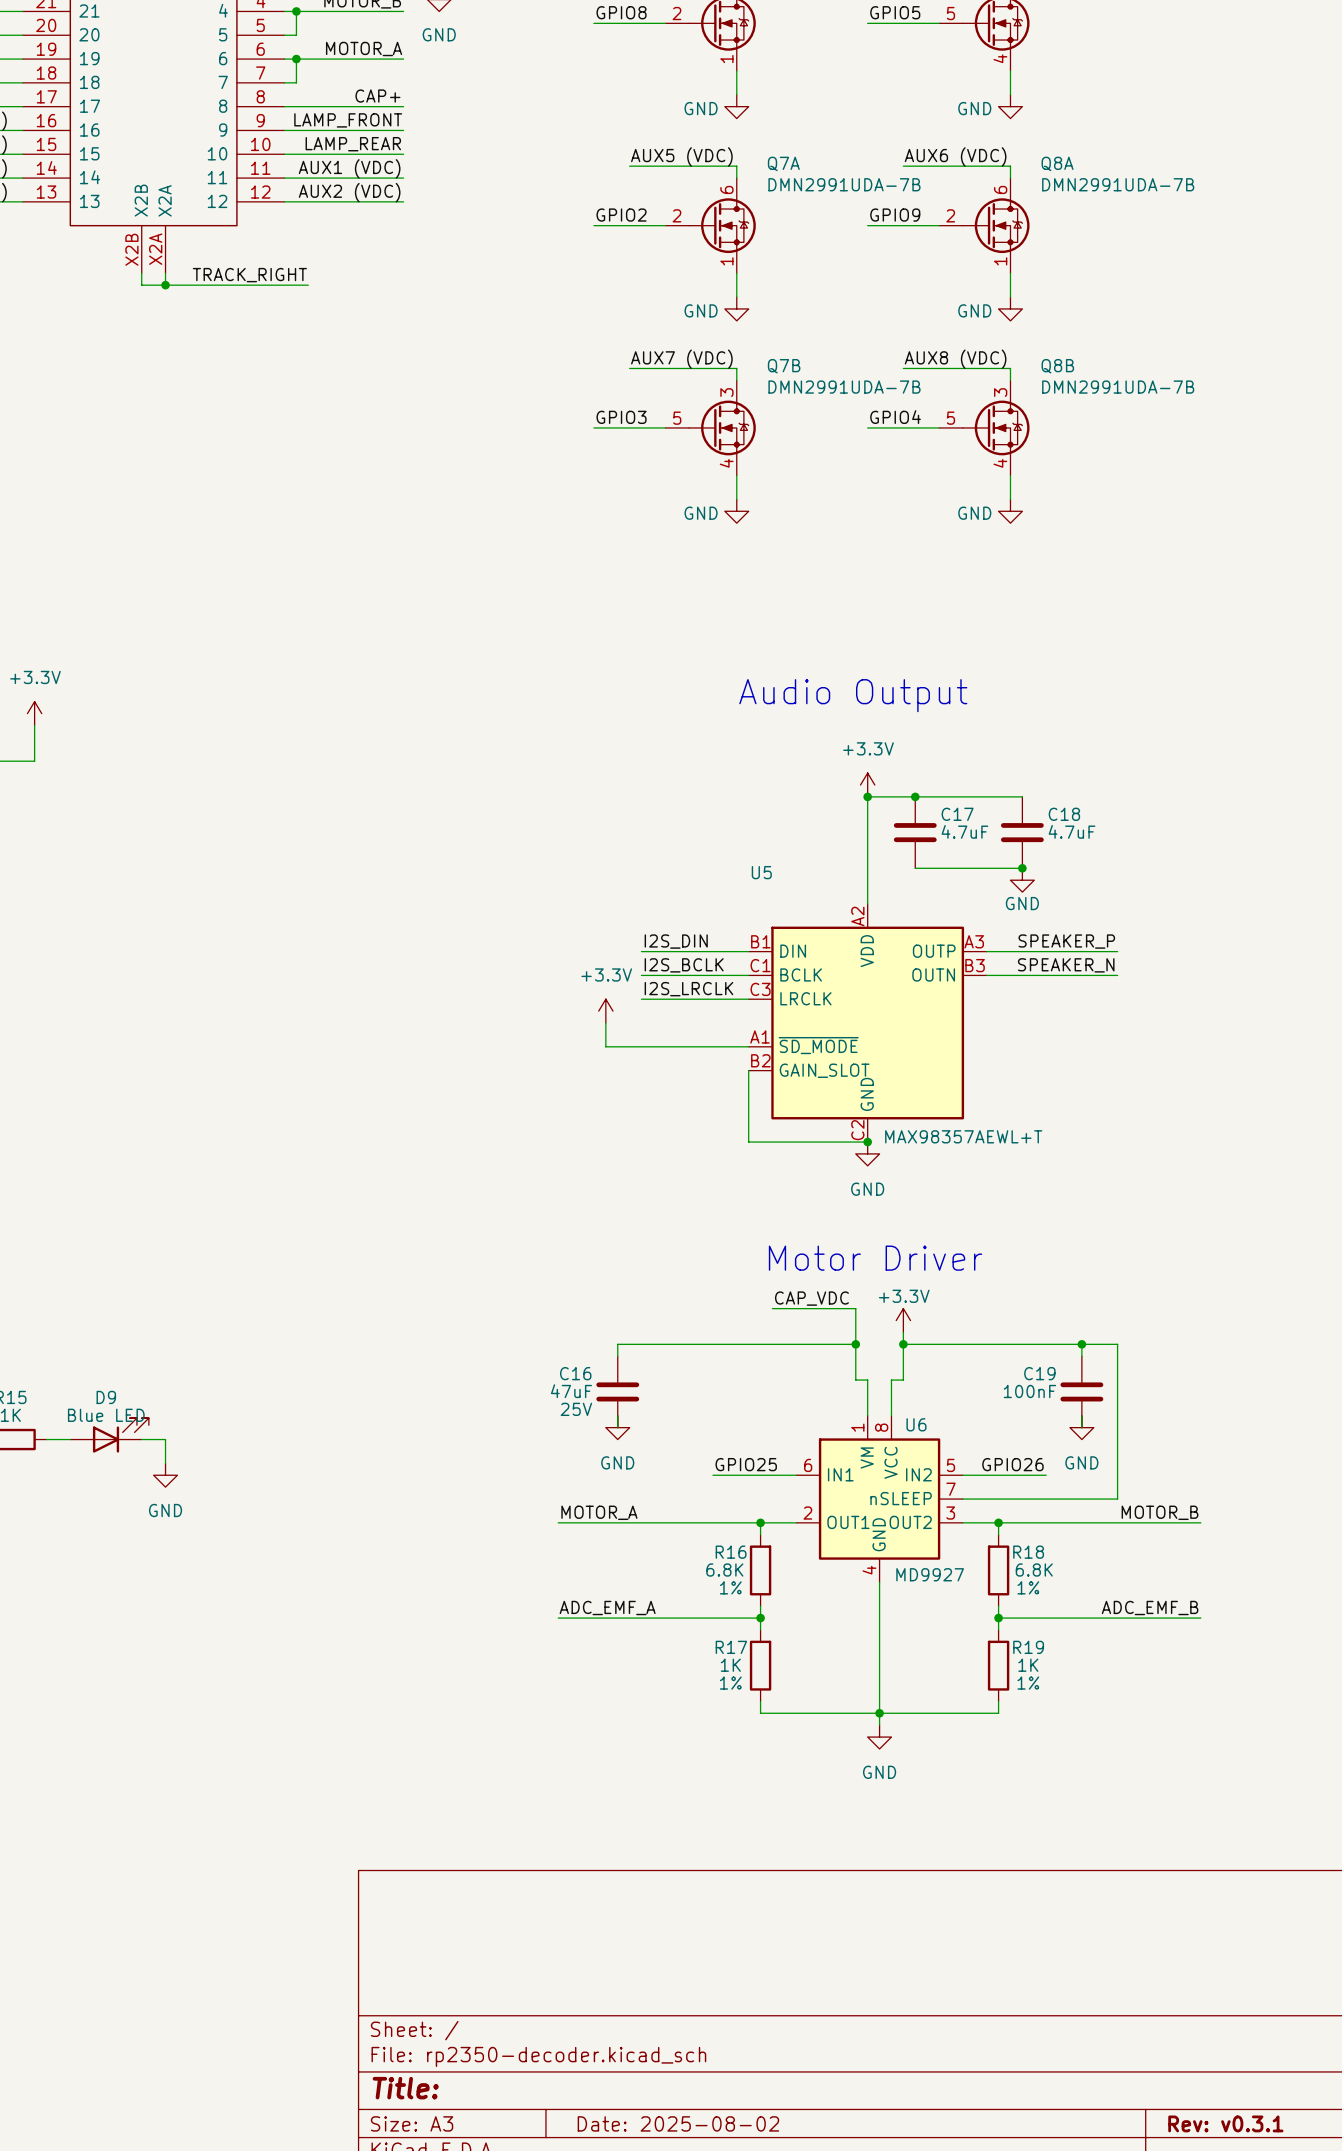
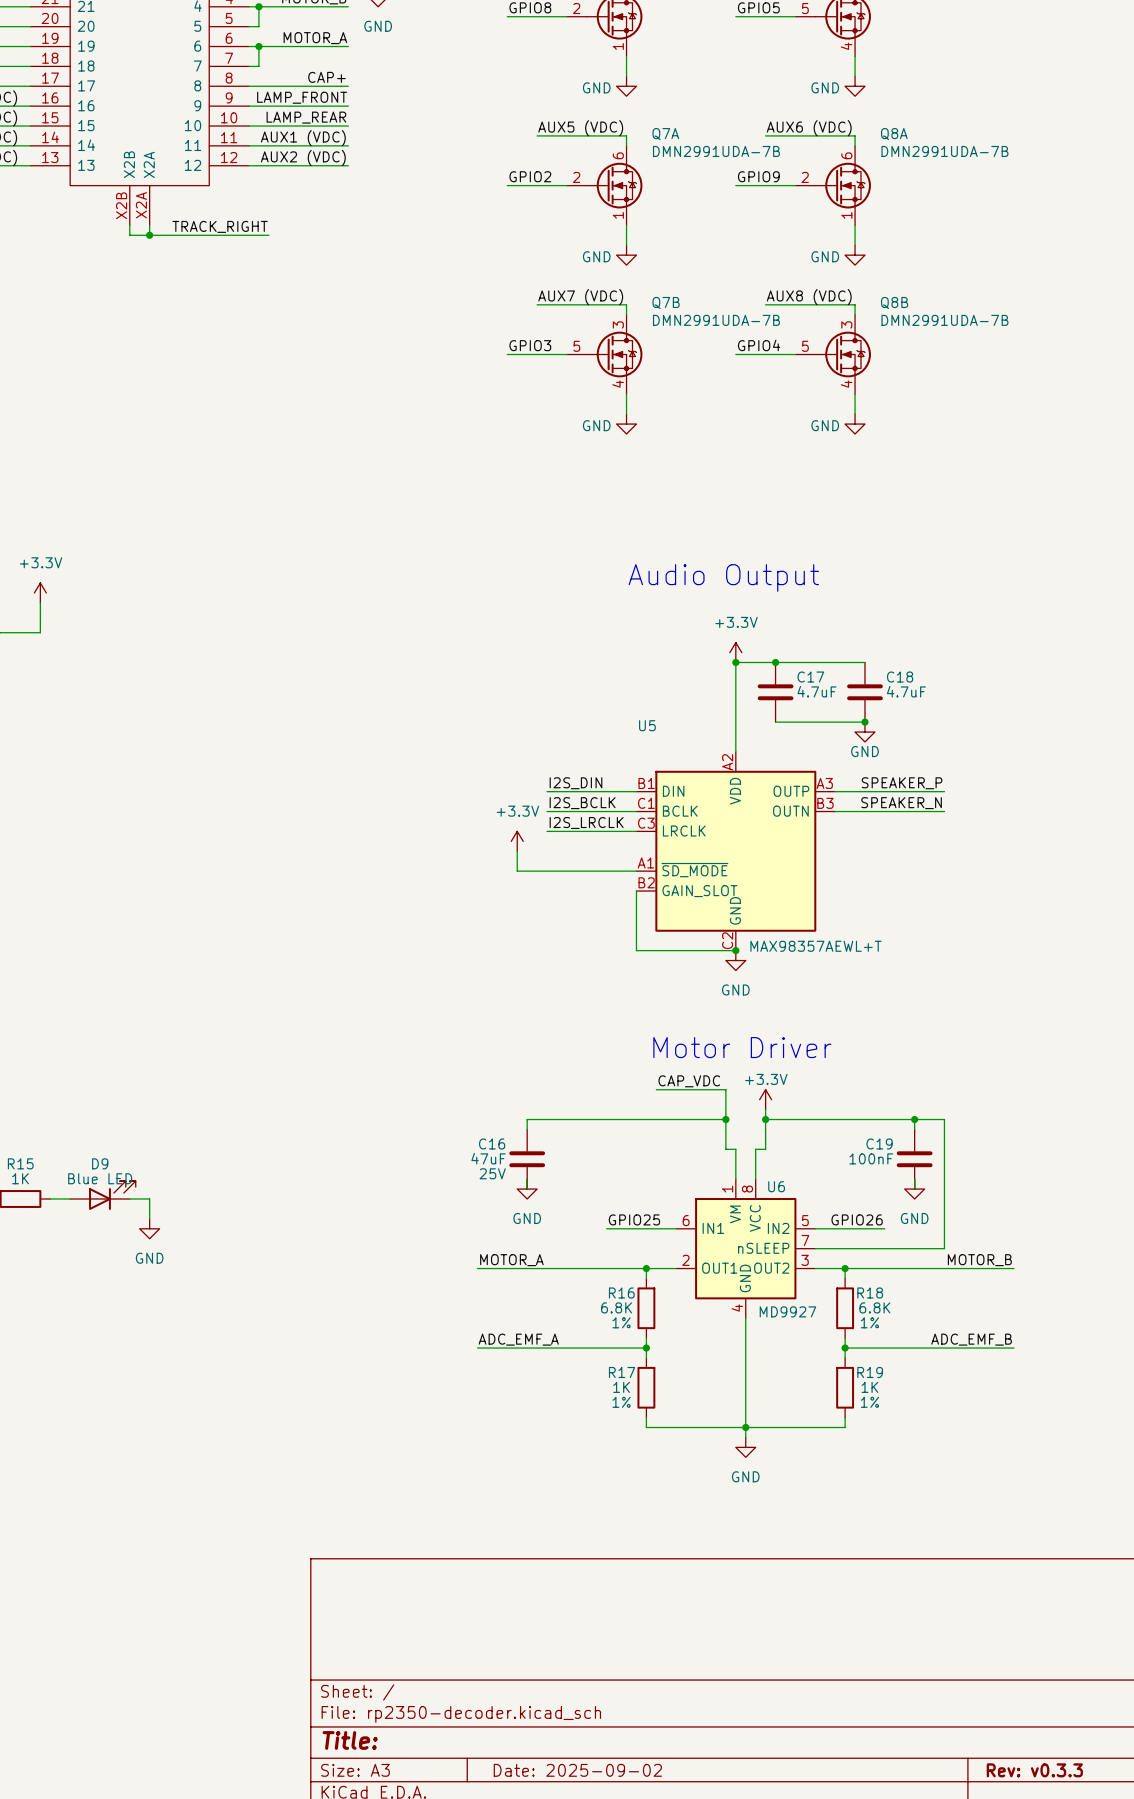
title block: Date: 2025-08-02 (678, 2123) -> Date: 2025-09-02 (577, 1770)
title block: Rev: v0.3.1 (1225, 2123) -> Rev: v0.3.3 (1034, 1770)

